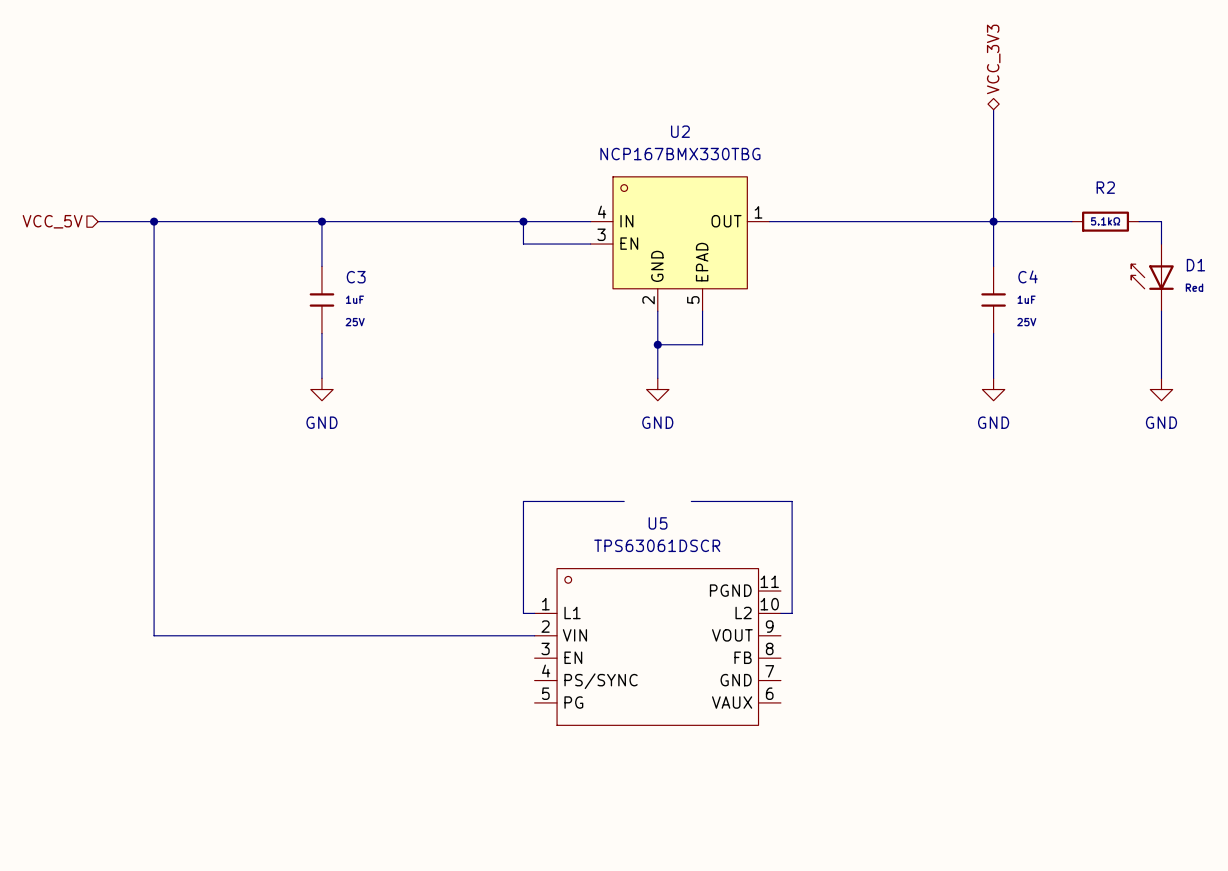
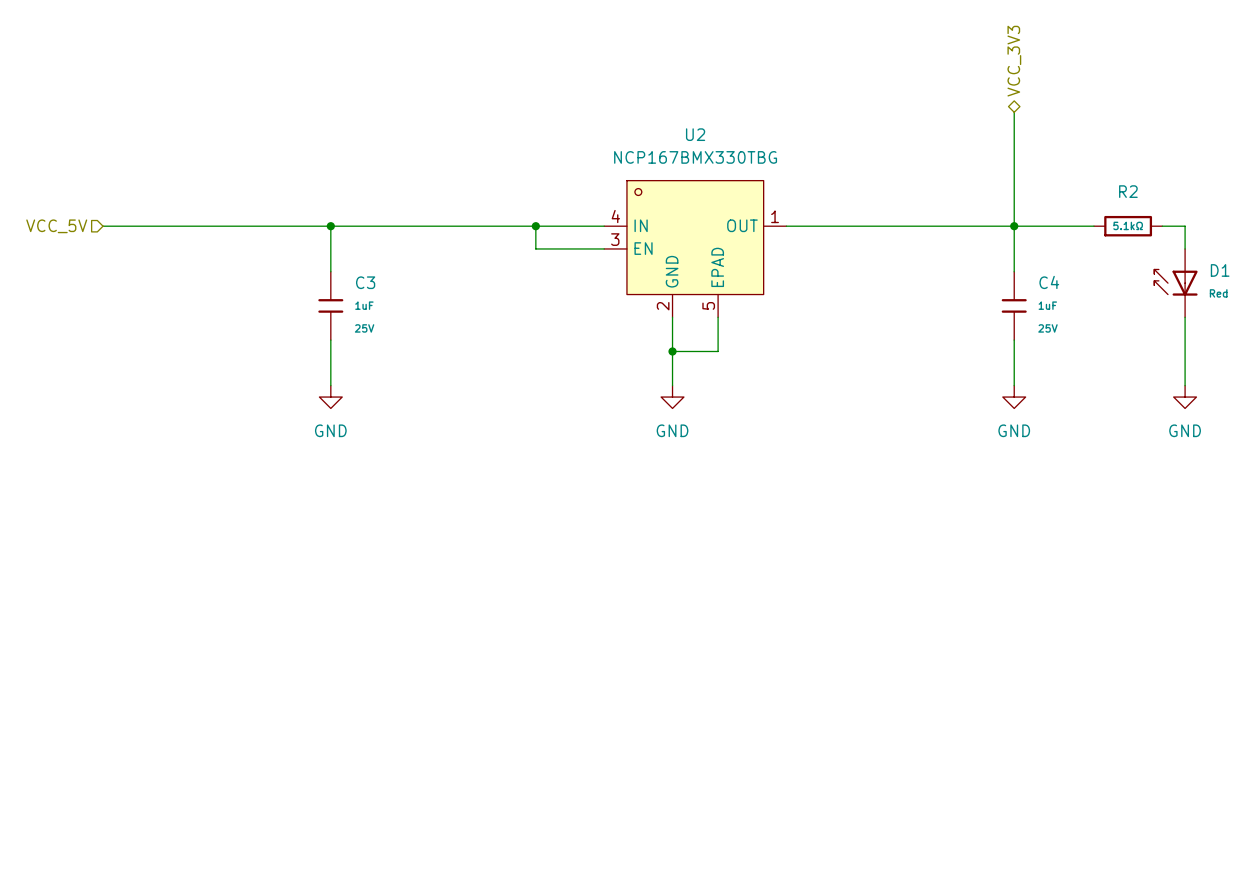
wire: (154, 221) (154, 635) (534, 635) -> none
junction: (154, 221) -> none
wire: (624, 501) (523, 501) (523, 613) (534, 613) -> none
wire: (691, 501) (792, 501) (792, 613) (780, 613) -> none
U5: TPS63061DSCR (657, 646) -> none

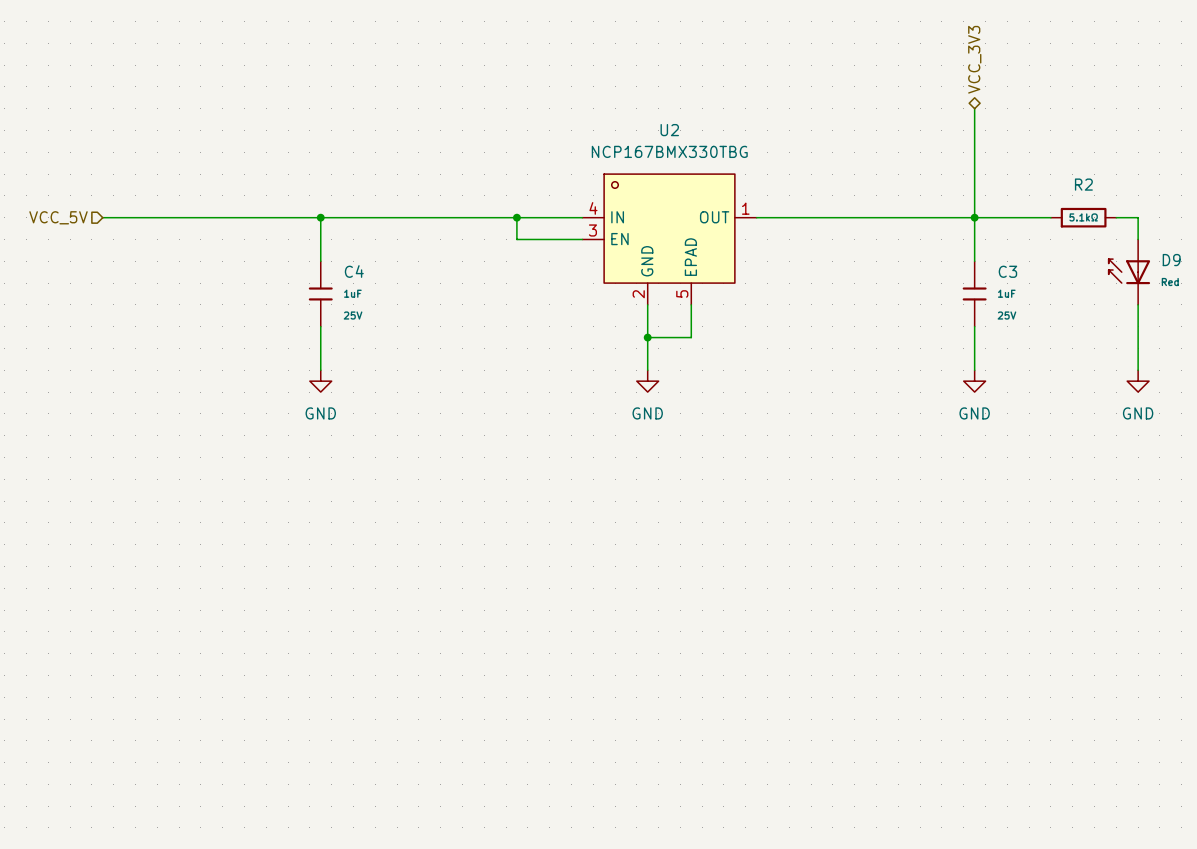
D1 name: D1 (1220, 270) -> D9 (1171, 260)
C3 name: C3 (365, 282) -> C4 (354, 271)
C4 name: C4 (1049, 282) -> C3 (1007, 271)

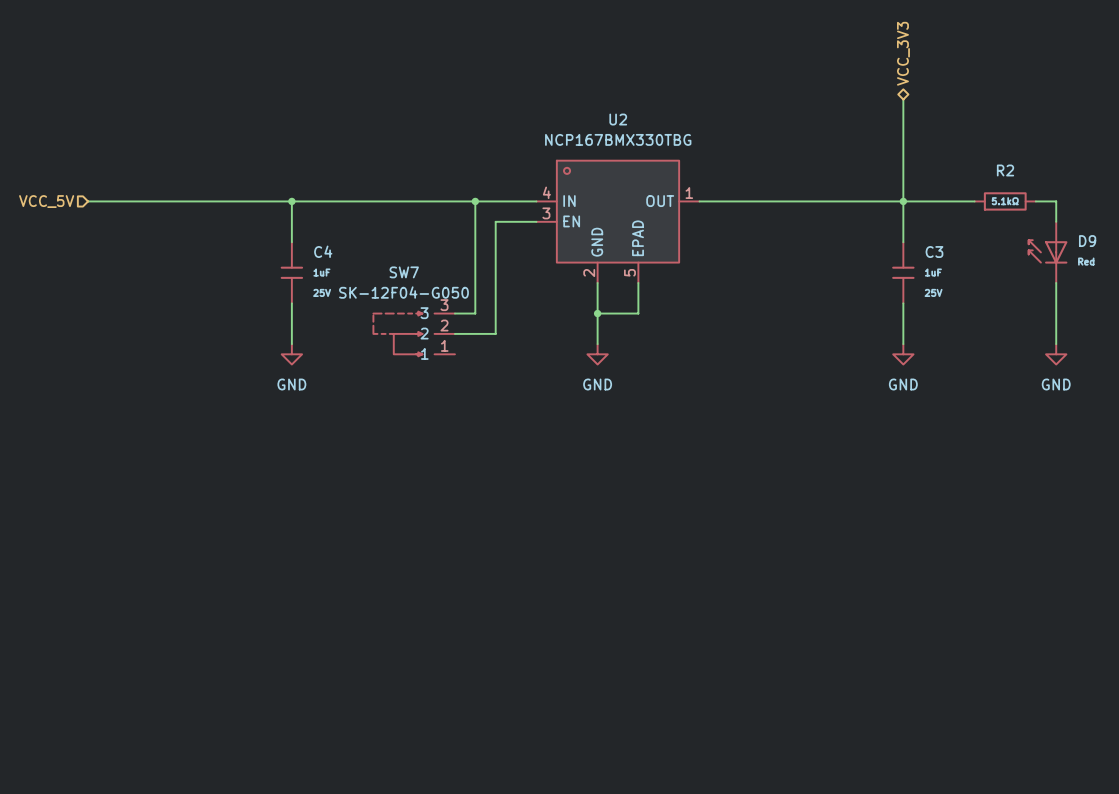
wire: (516, 239) (538, 239) -> (475, 221) (475, 313) (454, 313)
wire: none -> (495, 221) (495, 333) (454, 333)
SW7: none -> SK-12F04-G050 (414, 333)

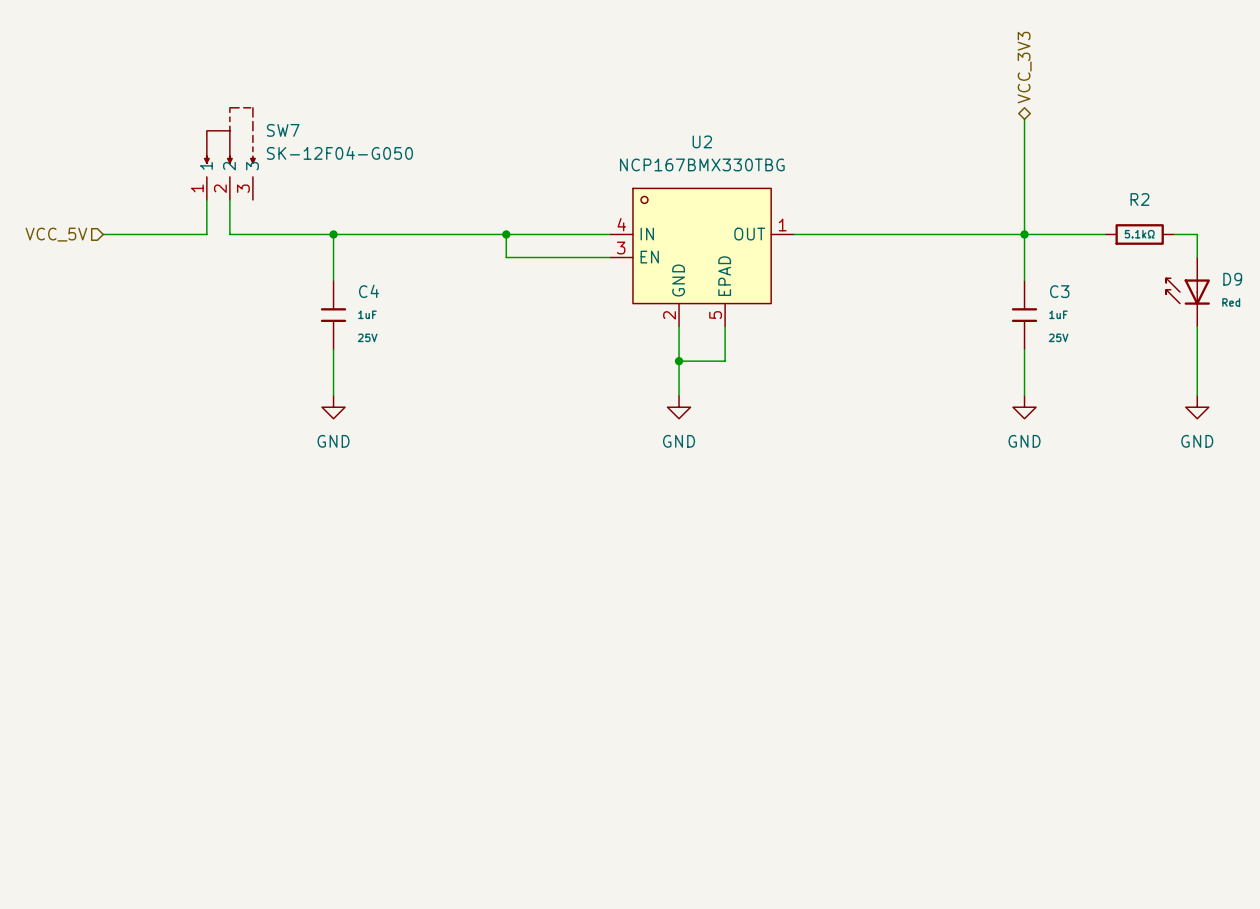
wire: none -> (229, 199) (229, 234)
wire: (179, 201) (200, 201) -> (206, 234) (206, 199)
wire: (475, 201) (475, 313) (454, 313) -> none
junction position: (475, 201) -> (506, 234)
wire: (495, 221) (495, 333) (454, 333) -> (563, 257) (506, 257) (506, 234)
SW7 value position: SK-12F04-G050 (403, 292) -> SK-12F04-G050 (339, 153)
SW7 rotation: 0° (397, 333) -> 90° clockwise (229, 135)
SW7 position: (414, 333) -> (229, 153)

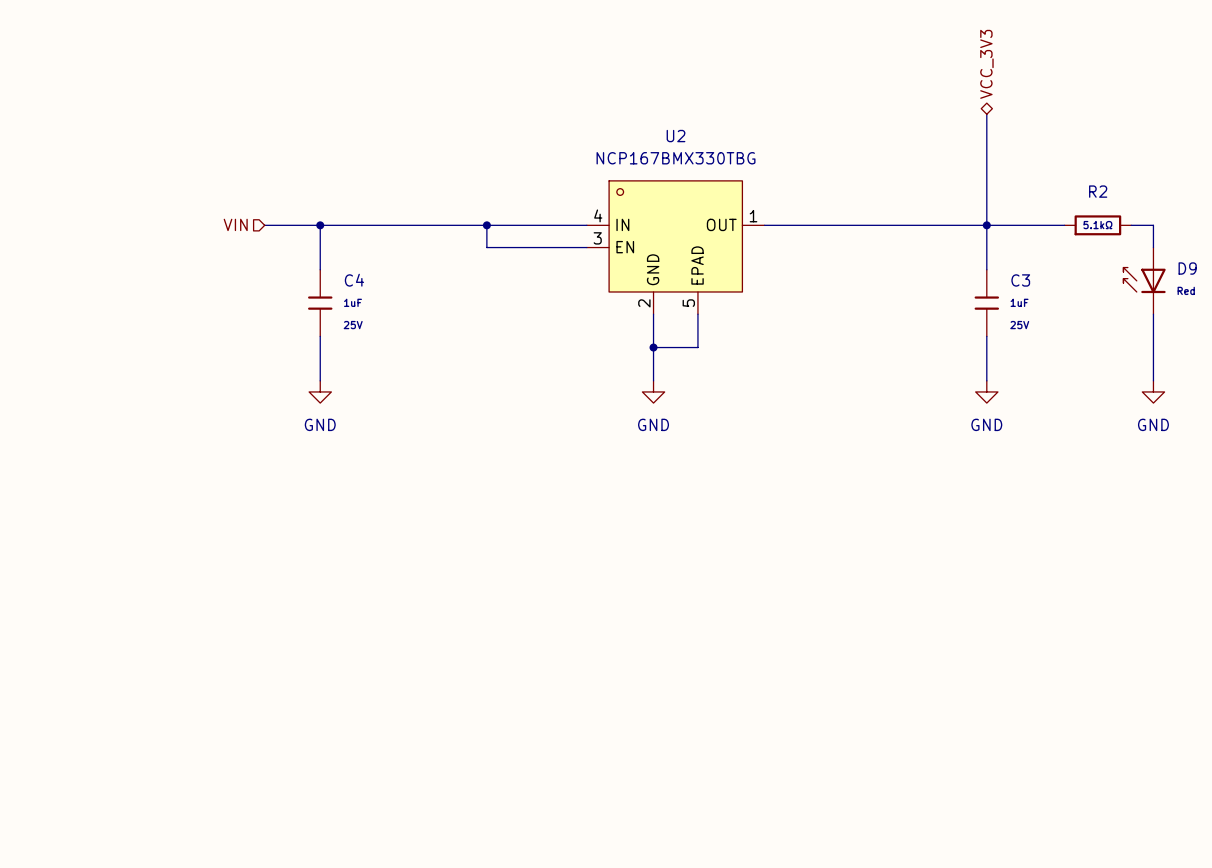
SW7: SK-12F04-G050 (229, 153) -> none
wire: (206, 199) (206, 234) (103, 234) -> none
wire: (229, 199) (229, 234) (275, 234) -> none
hierarchical label: VCC_5V (56, 234) -> none
hierarchical label: none -> VIN (235, 224)

